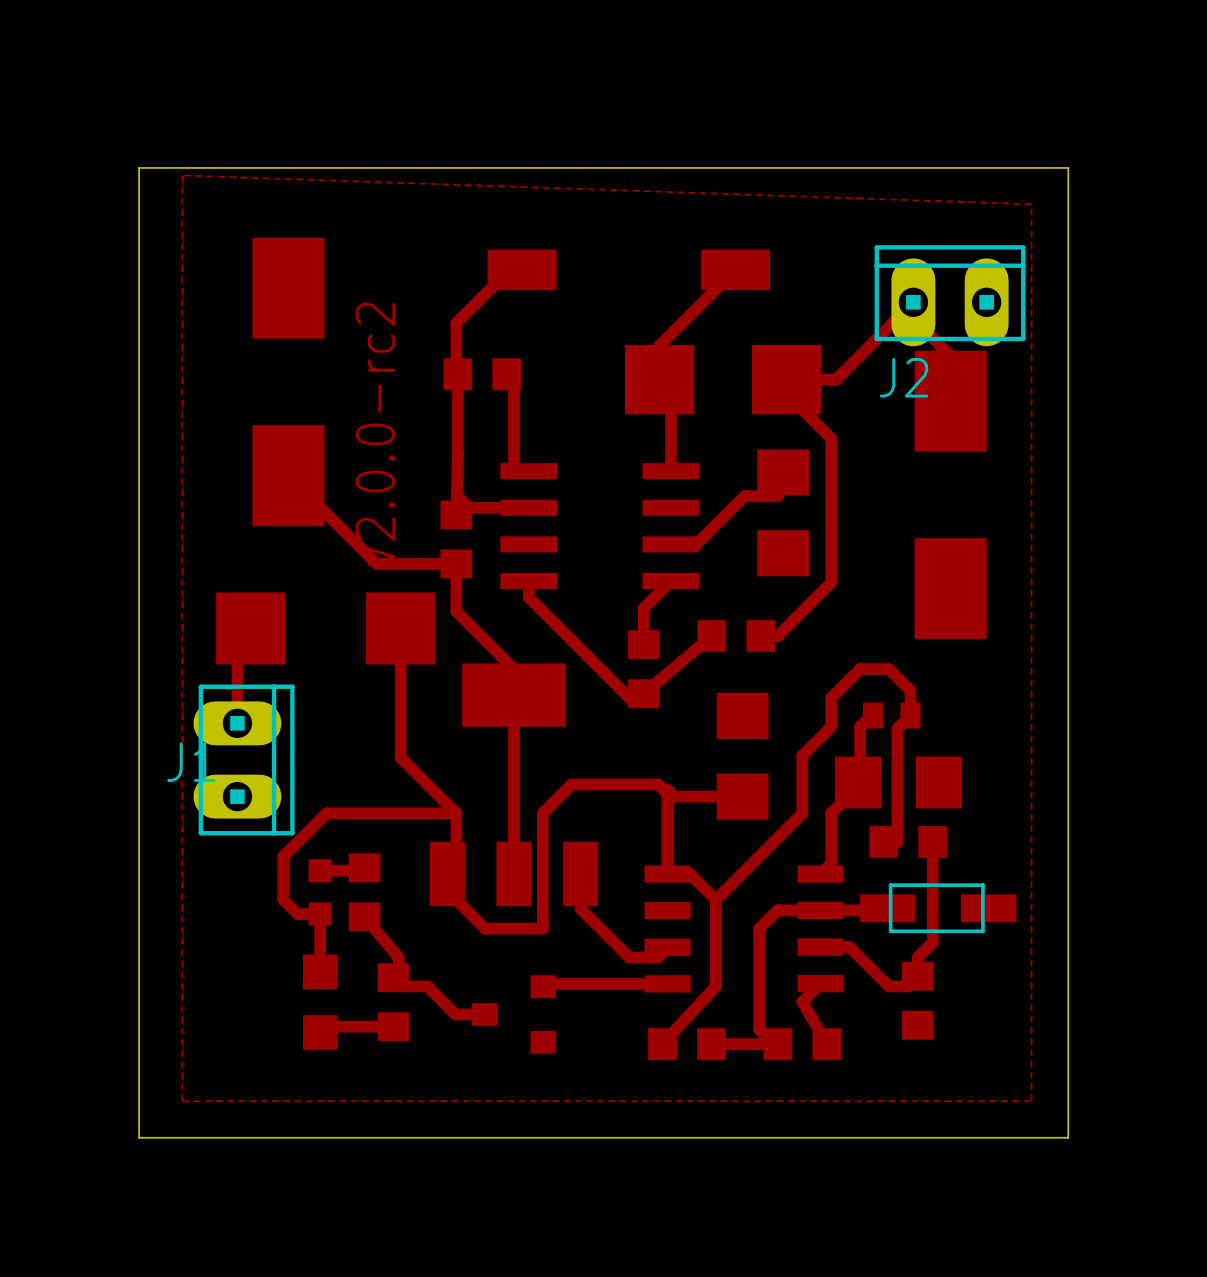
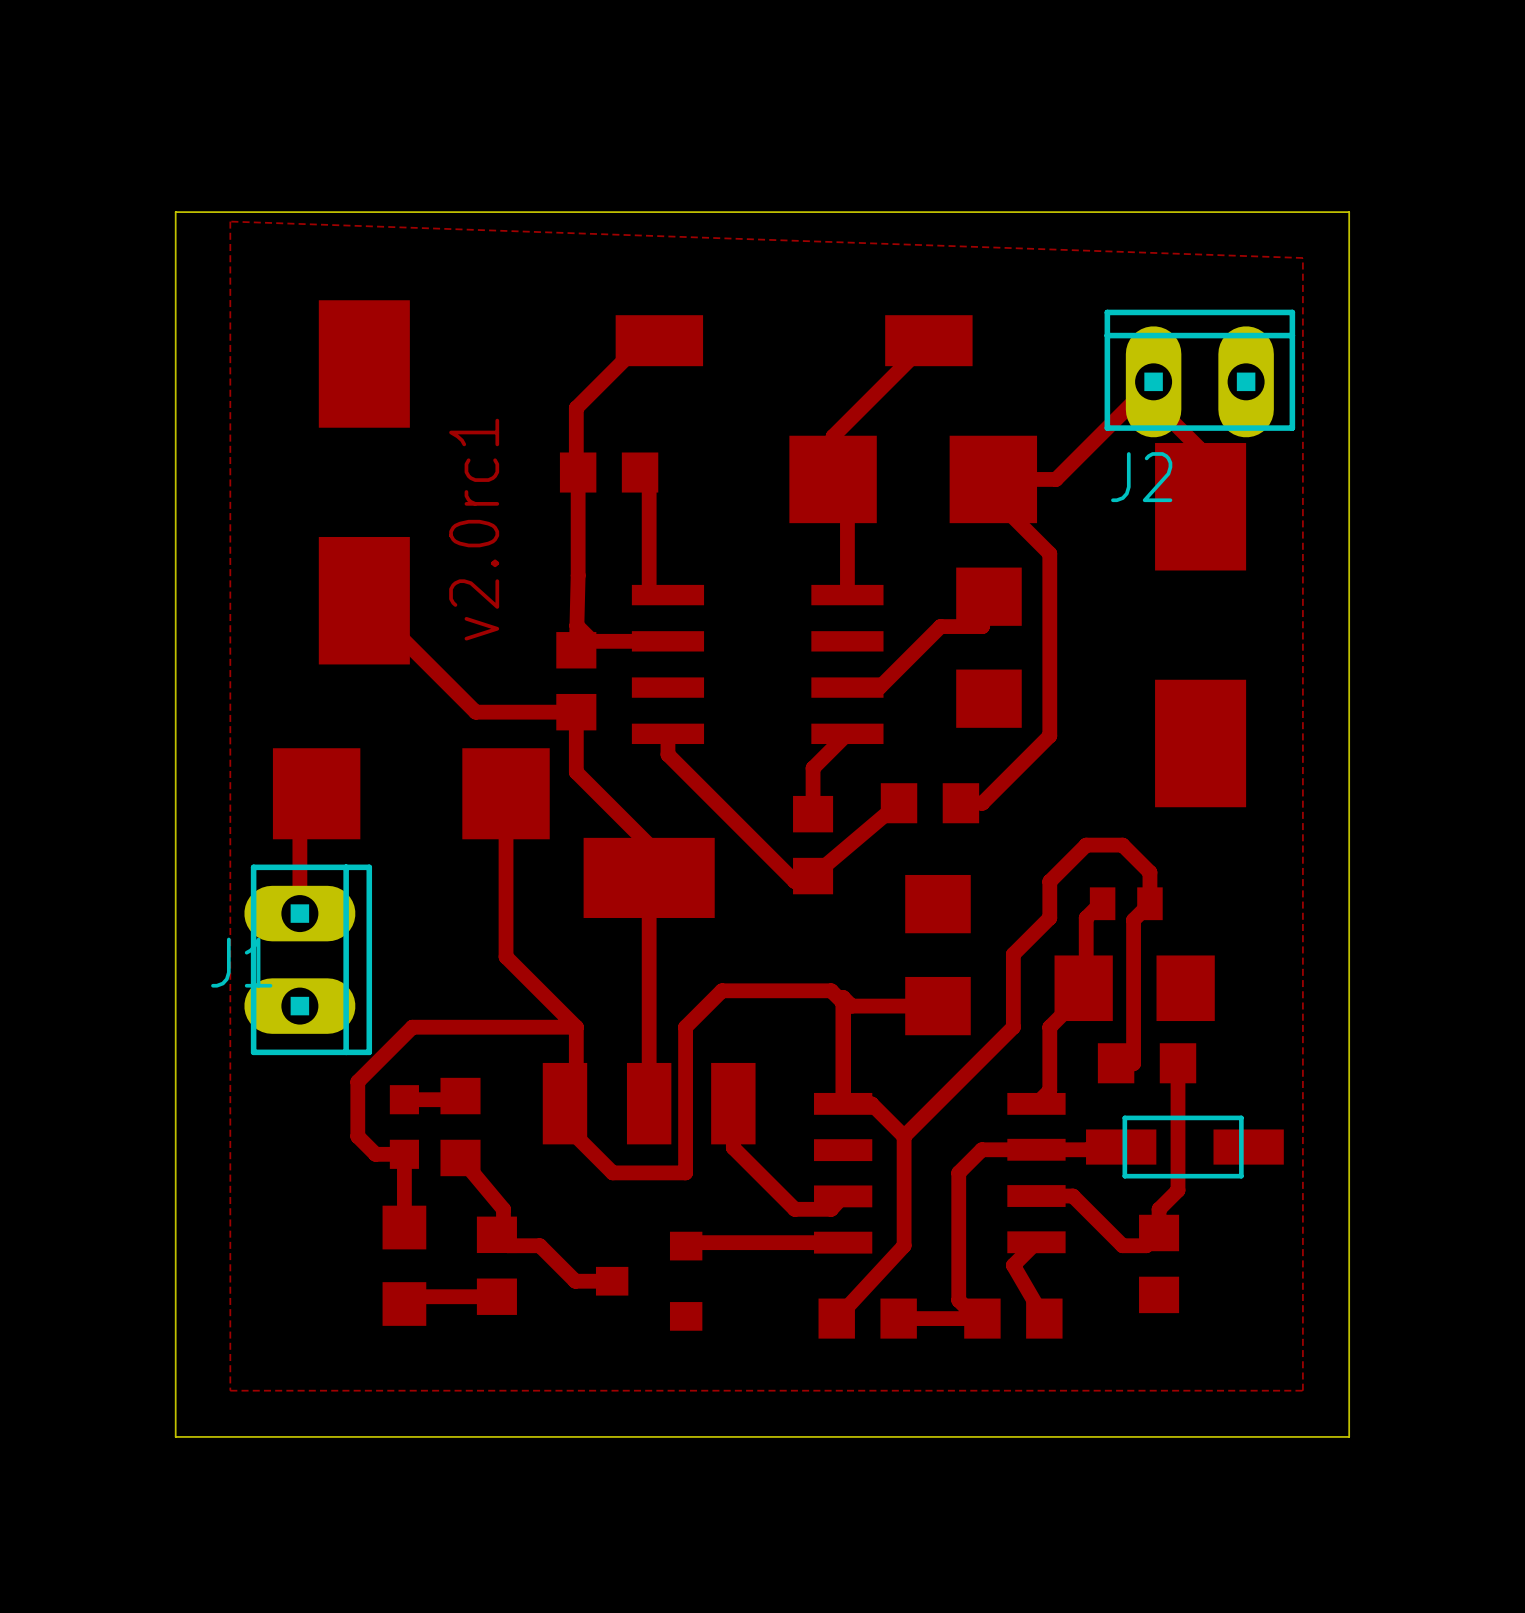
text: v2.0.0-rc2 (375, 434) -> v2.0rc1 (474, 529)

